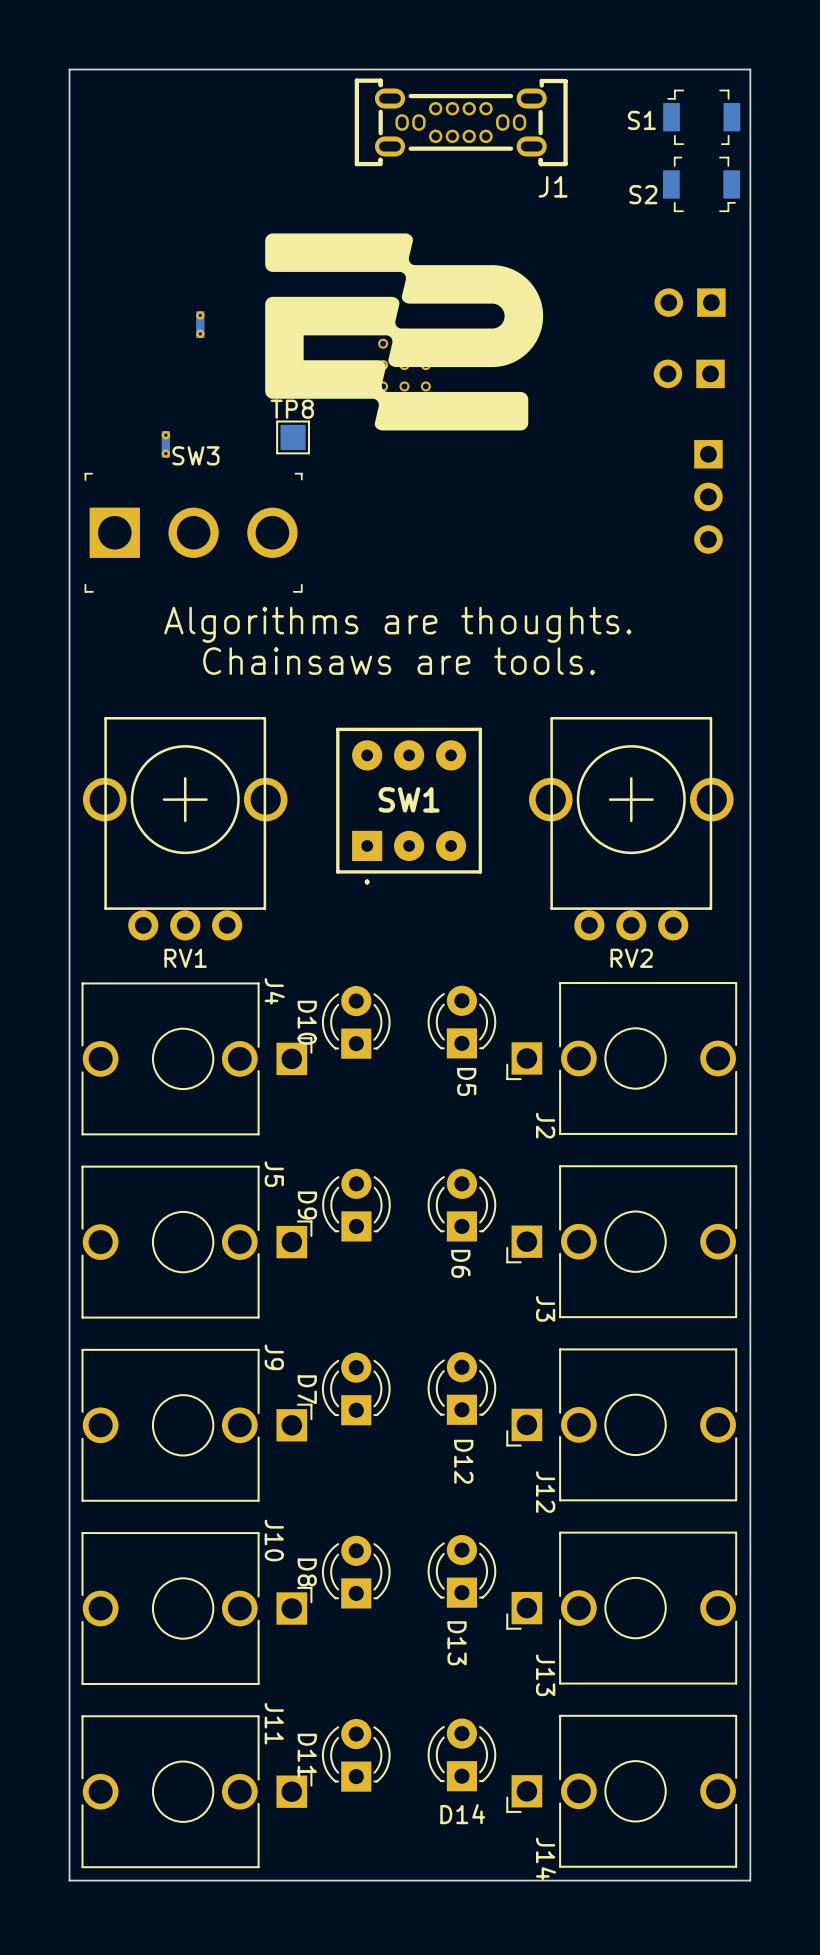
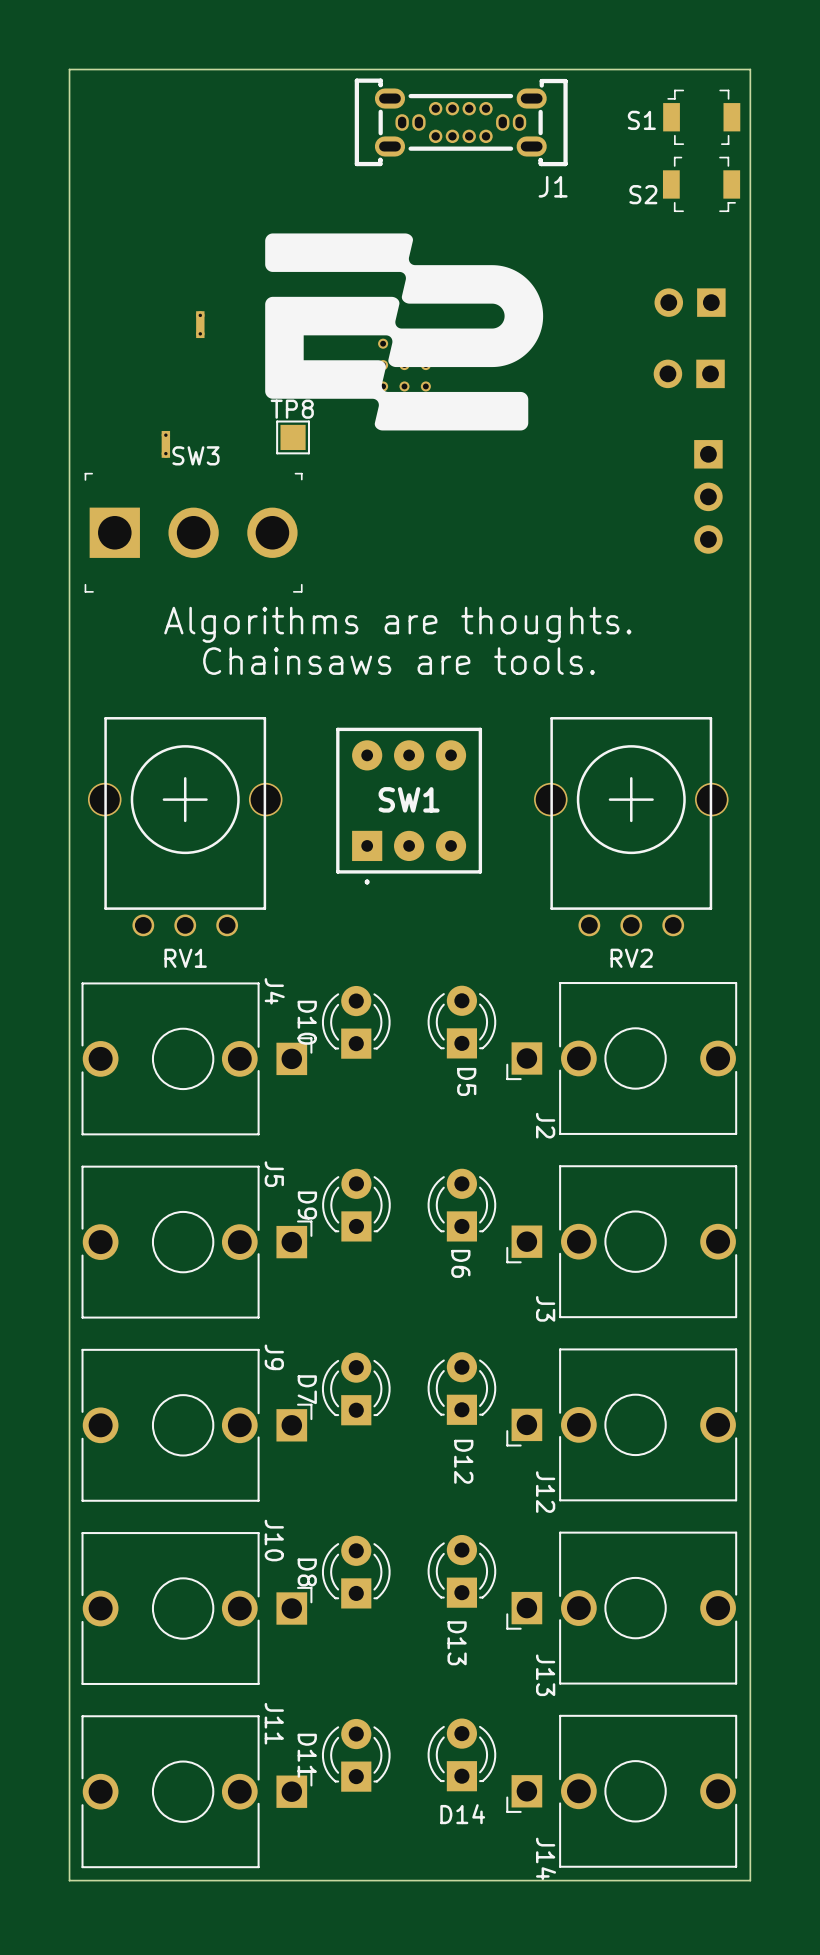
RV1 footprint: [82, 717, 288, 941] -> [87, 717, 283, 937]
RV2 footprint: [528, 717, 734, 941] -> [534, 717, 729, 937]

